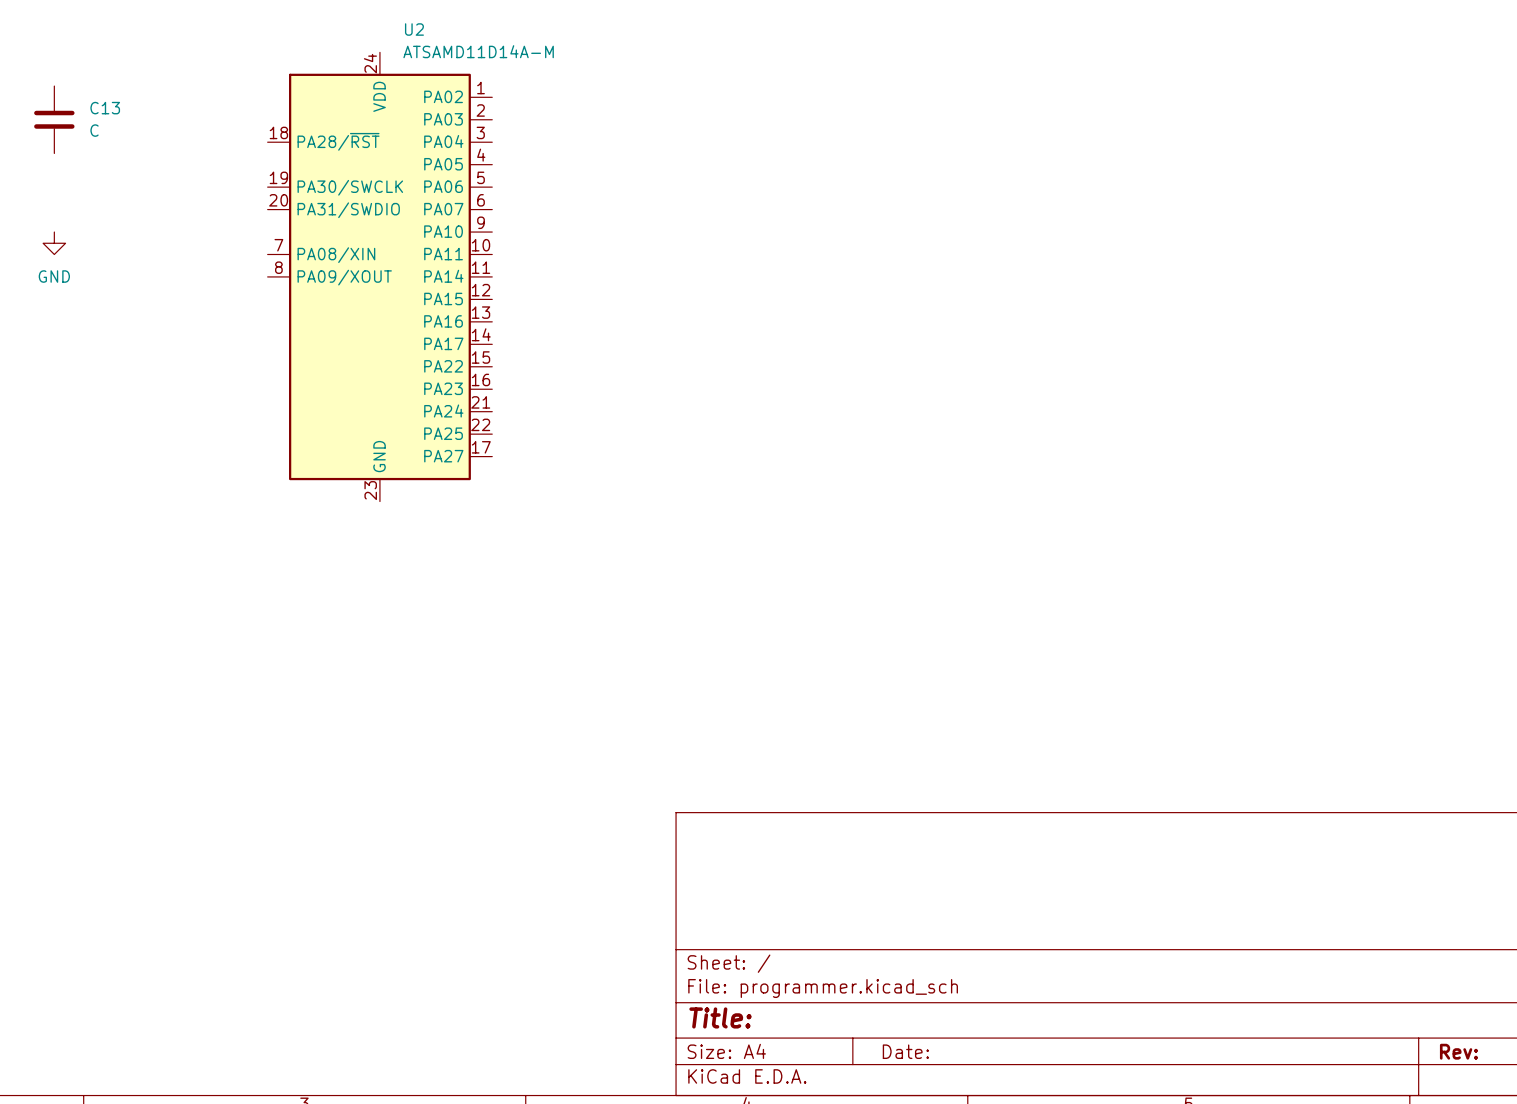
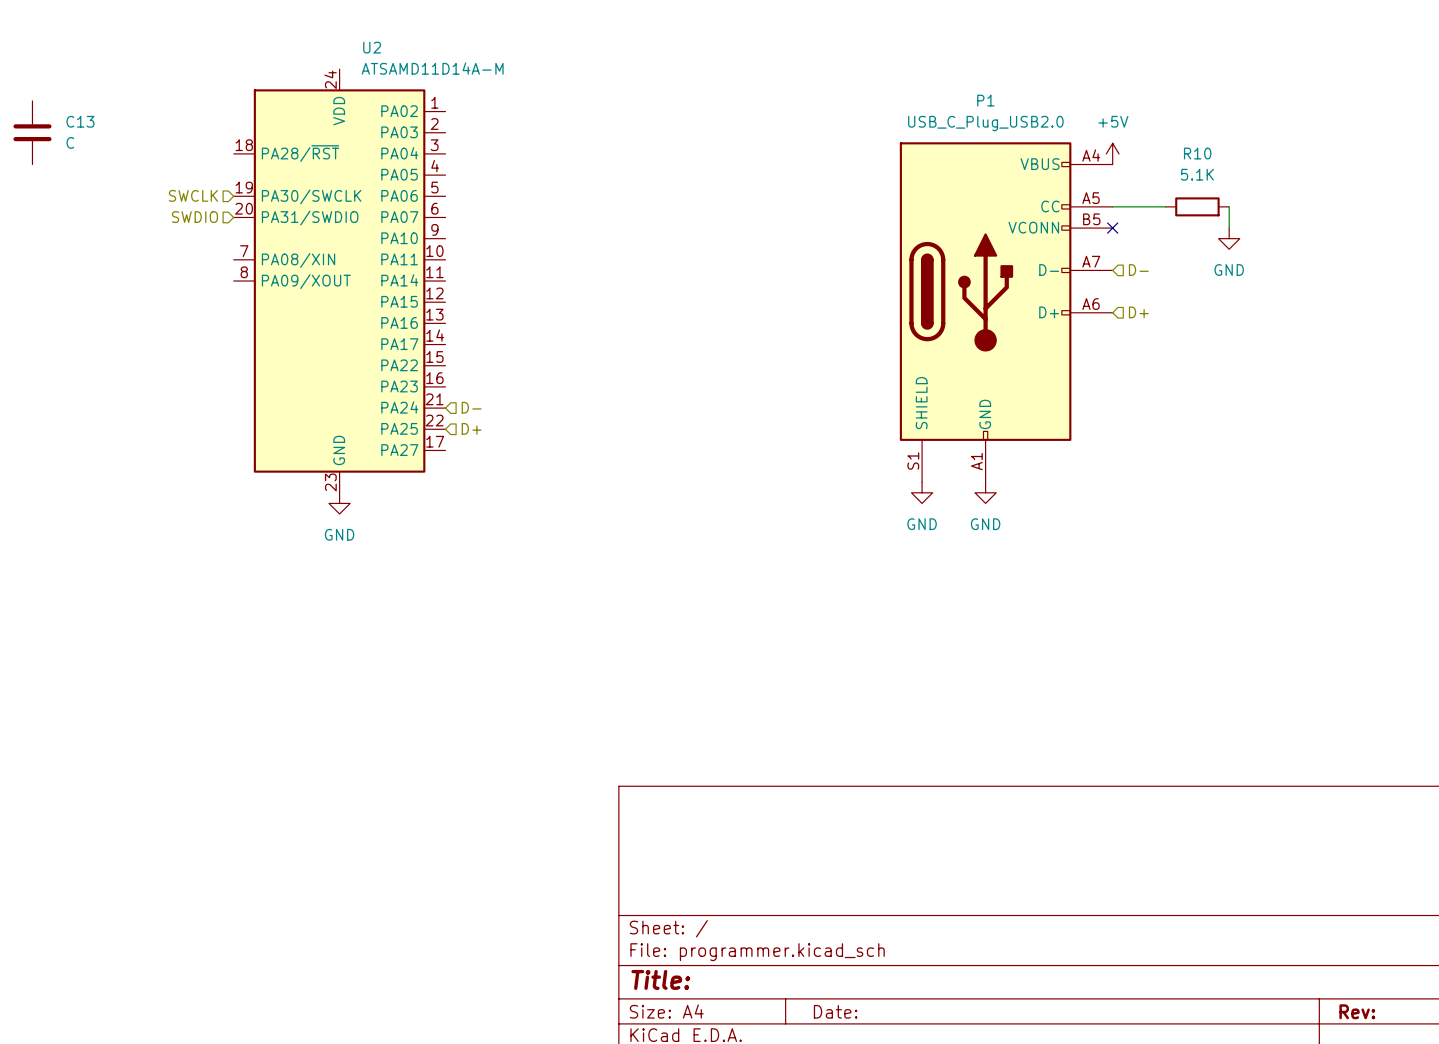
power symbol: none -> +5V (1112, 153)
hierarchical label: none -> SWCLK (193, 195)
wire: none -> (1112, 206) (1165, 206)
R10: none -> 5.1K (1197, 206)
wire: none -> (1229, 206) (1229, 228)
hierarchical label: none -> SWDIO (194, 217)
no-connect mark: none -> (1112, 228)
power symbol: none -> GND (1229, 238)
power symbol: GND (54, 243) -> none
hierarchical label: none -> D- (1138, 270)
P1: none -> USB_C_Plug_USB2.0 (1006, 312)
hierarchical label: none -> D+ (1138, 312)
hierarchical label: none -> D- (471, 407)
hierarchical label: none -> D+ (471, 428)
power symbol: none -> GND (922, 492)
power symbol: none -> GND (985, 492)
power symbol: none -> GND (339, 503)

